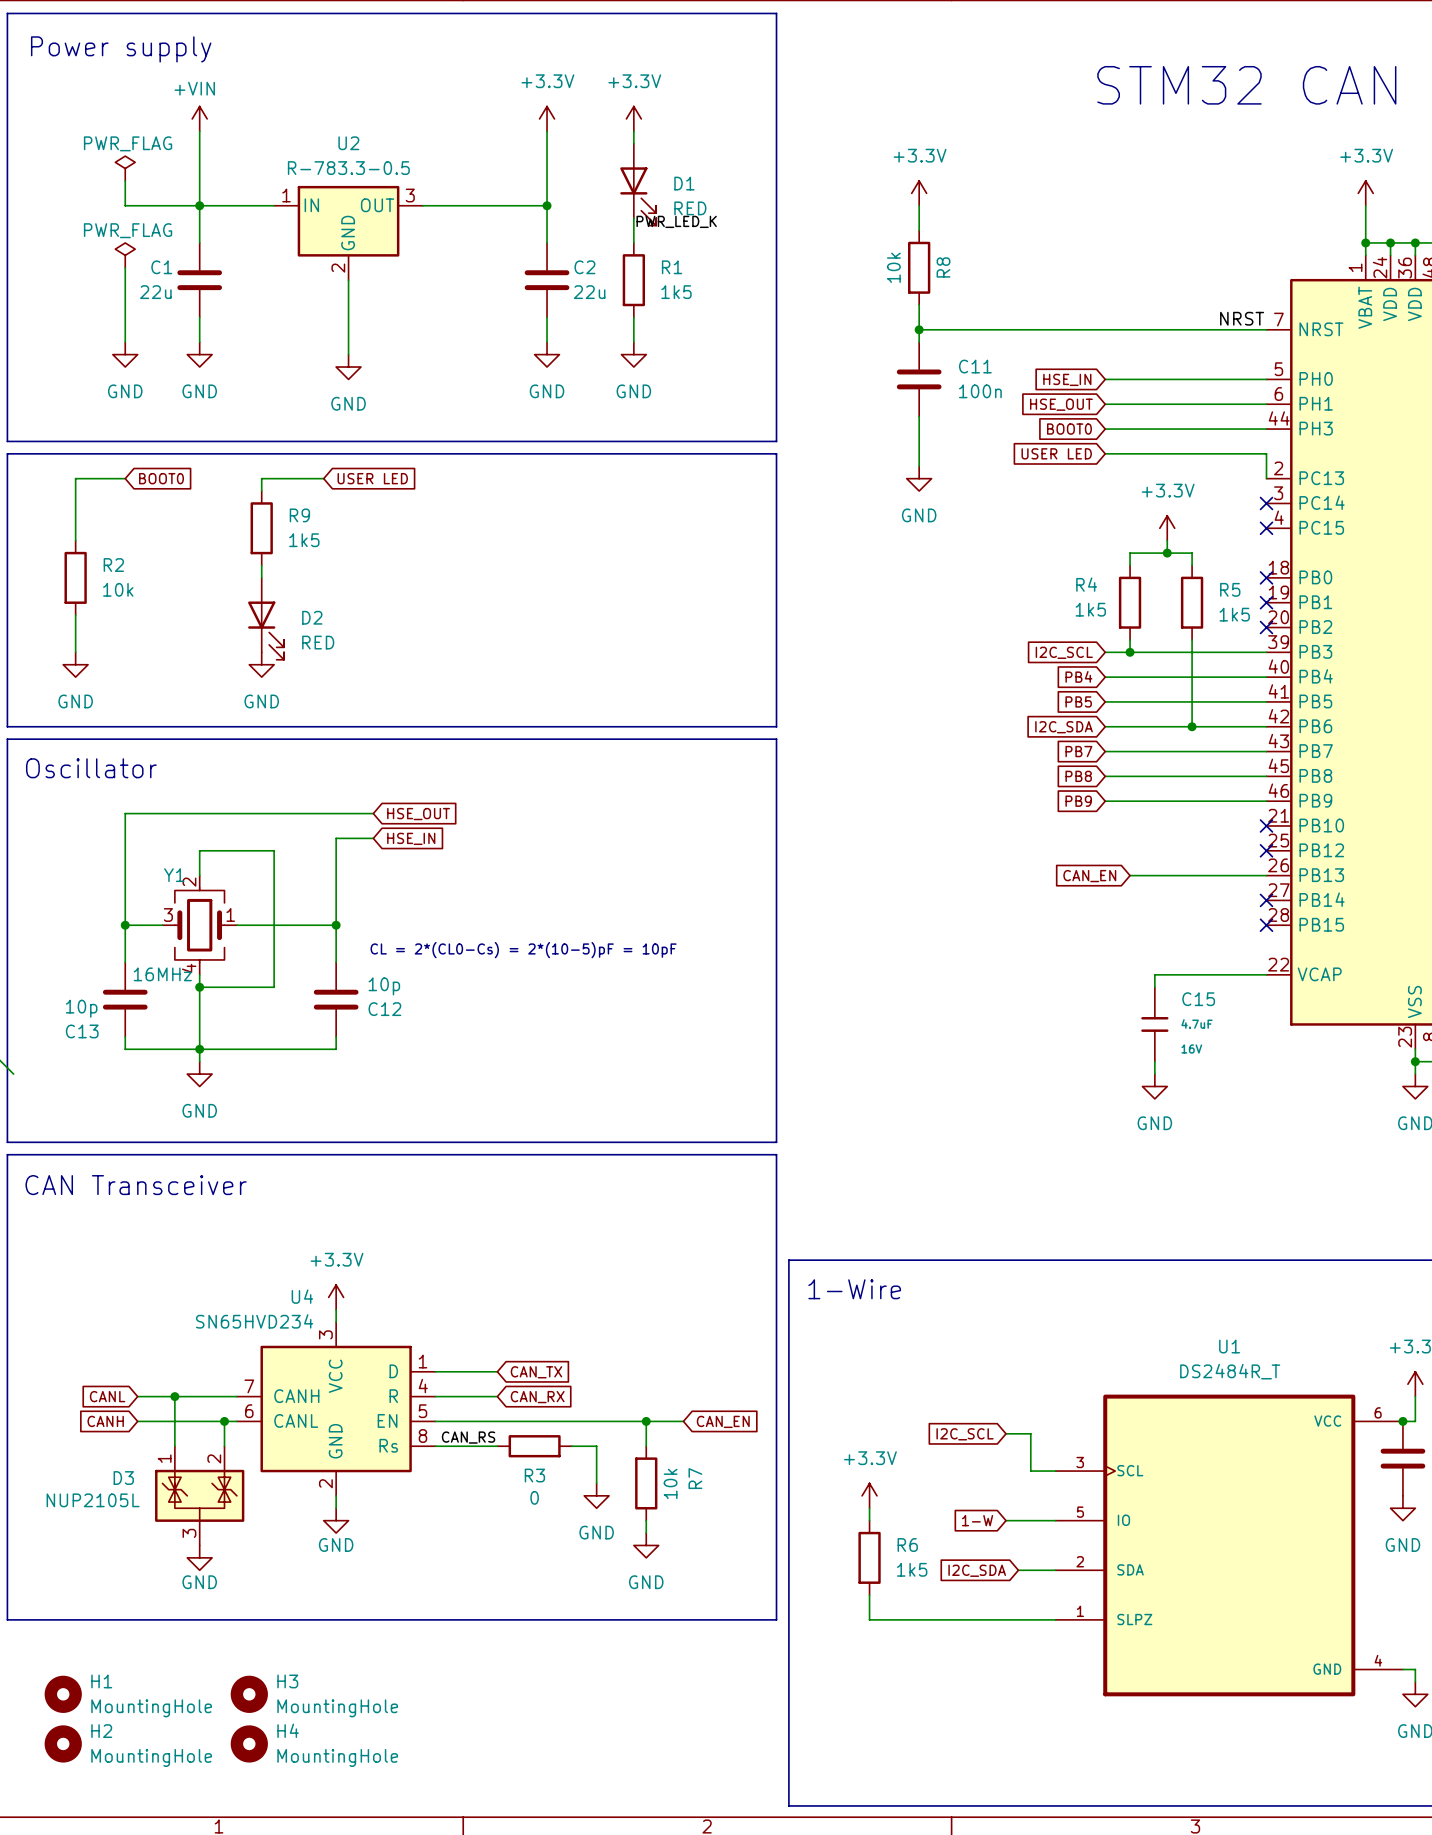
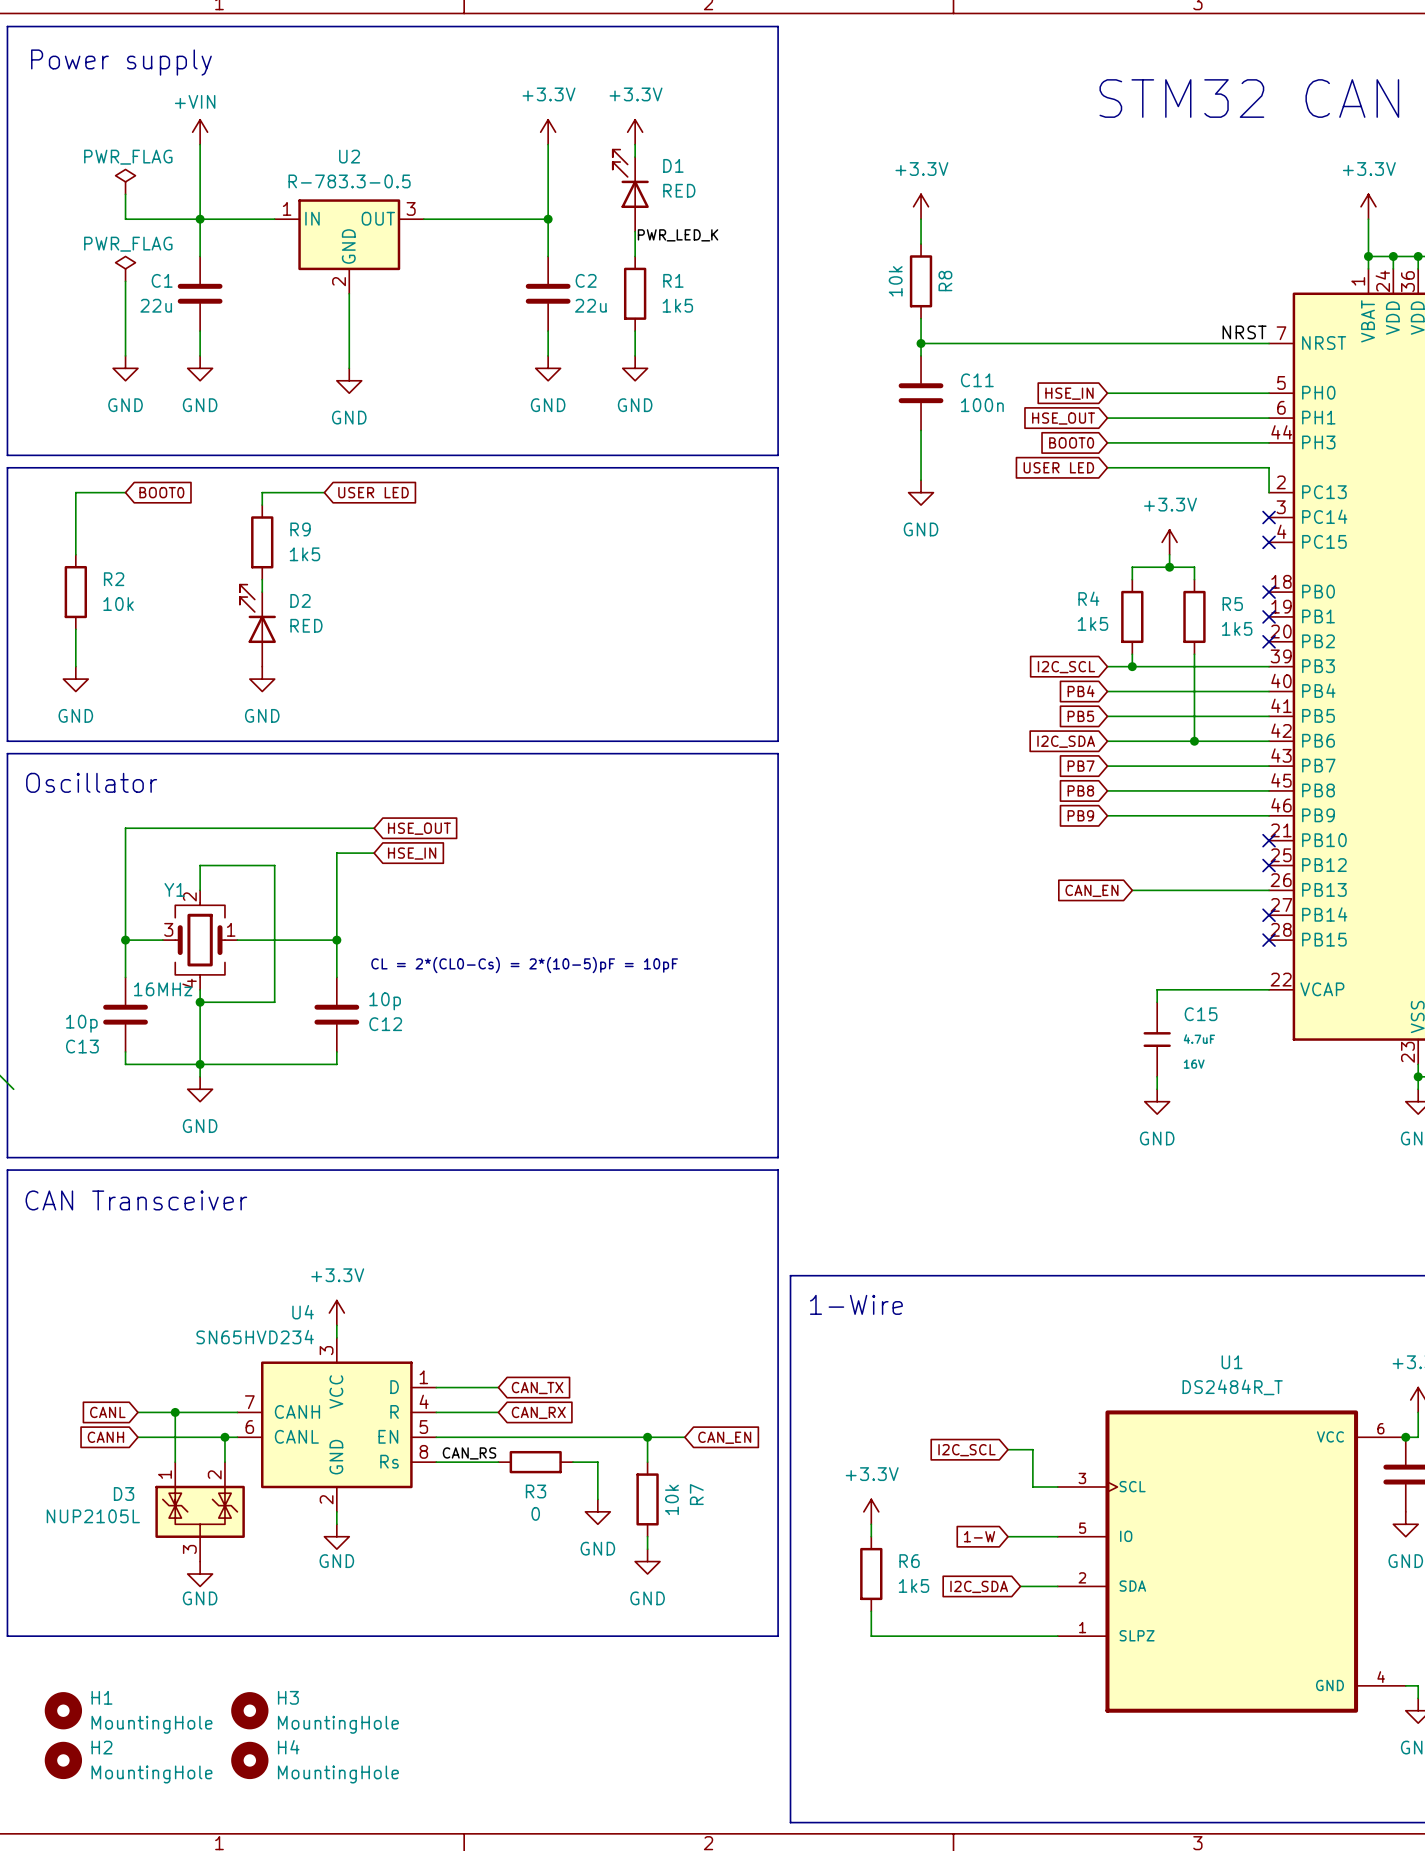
D1 name position: D1 (684, 183) -> D1 (673, 165)
D1 rotation: 0° (638, 196) -> 180° (630, 178)
D1 value position: RED (690, 208) -> RED (679, 190)
D2 name position: D2 (312, 617) -> D2 (300, 600)
D2 rotation: 0° (266, 630) -> 180° (257, 613)
D2 value position: RED (318, 642) -> RED (306, 625)

